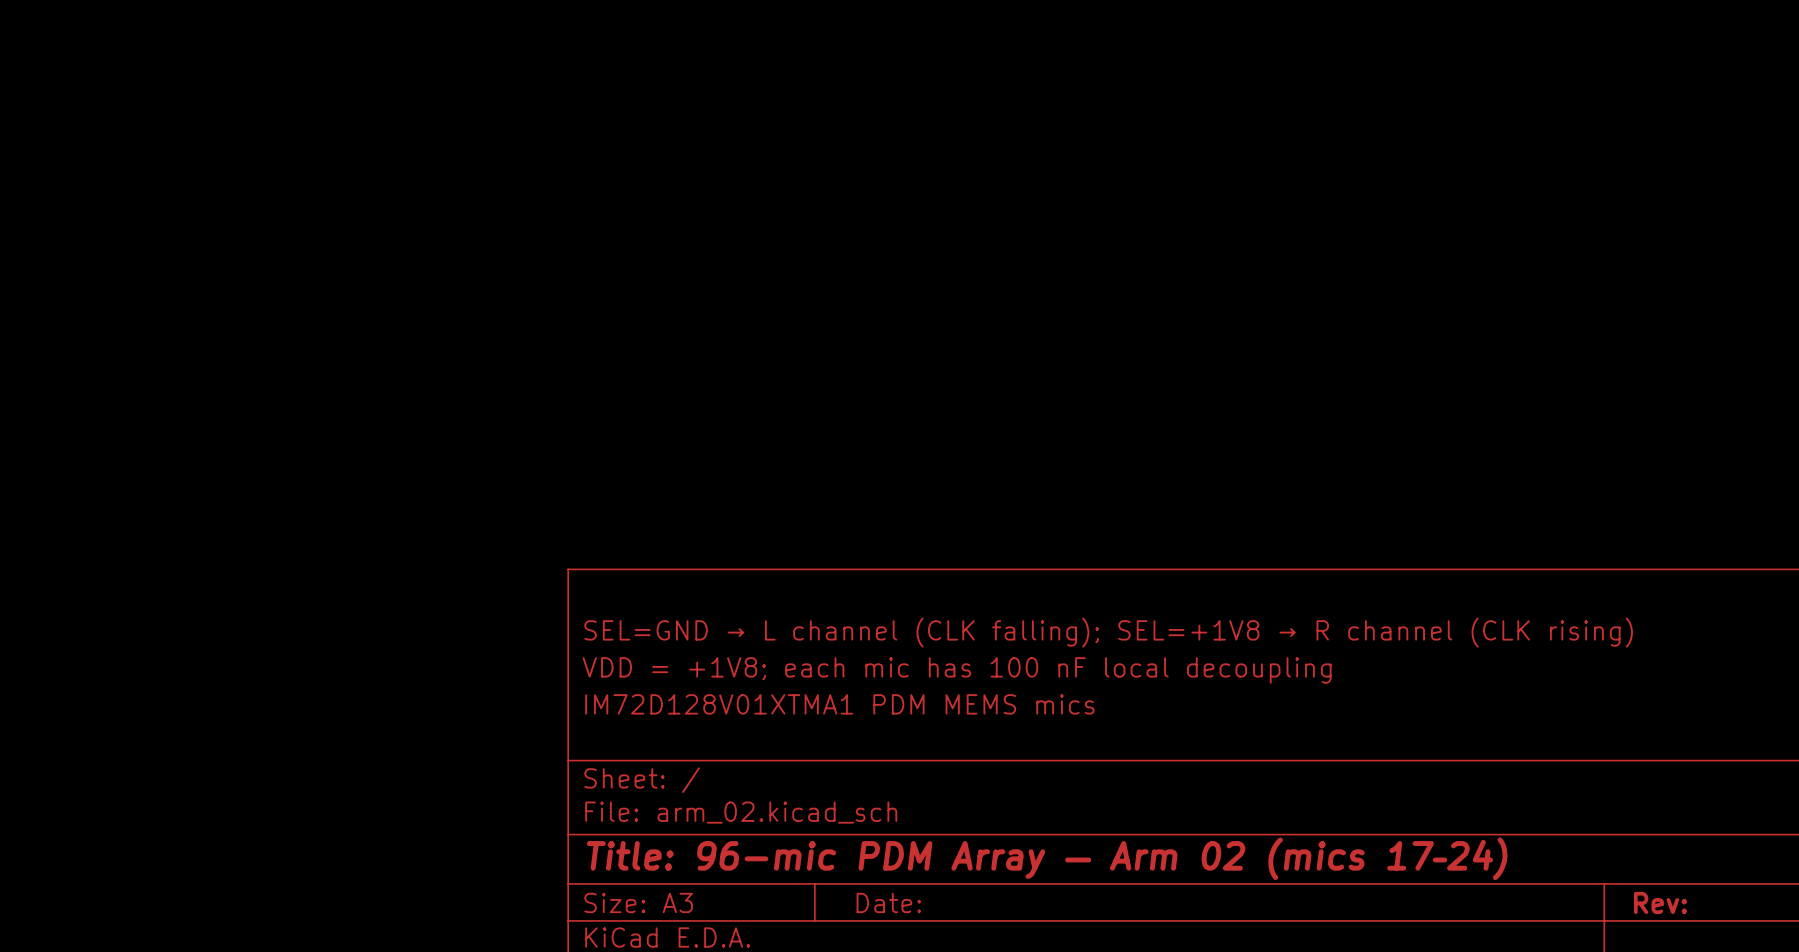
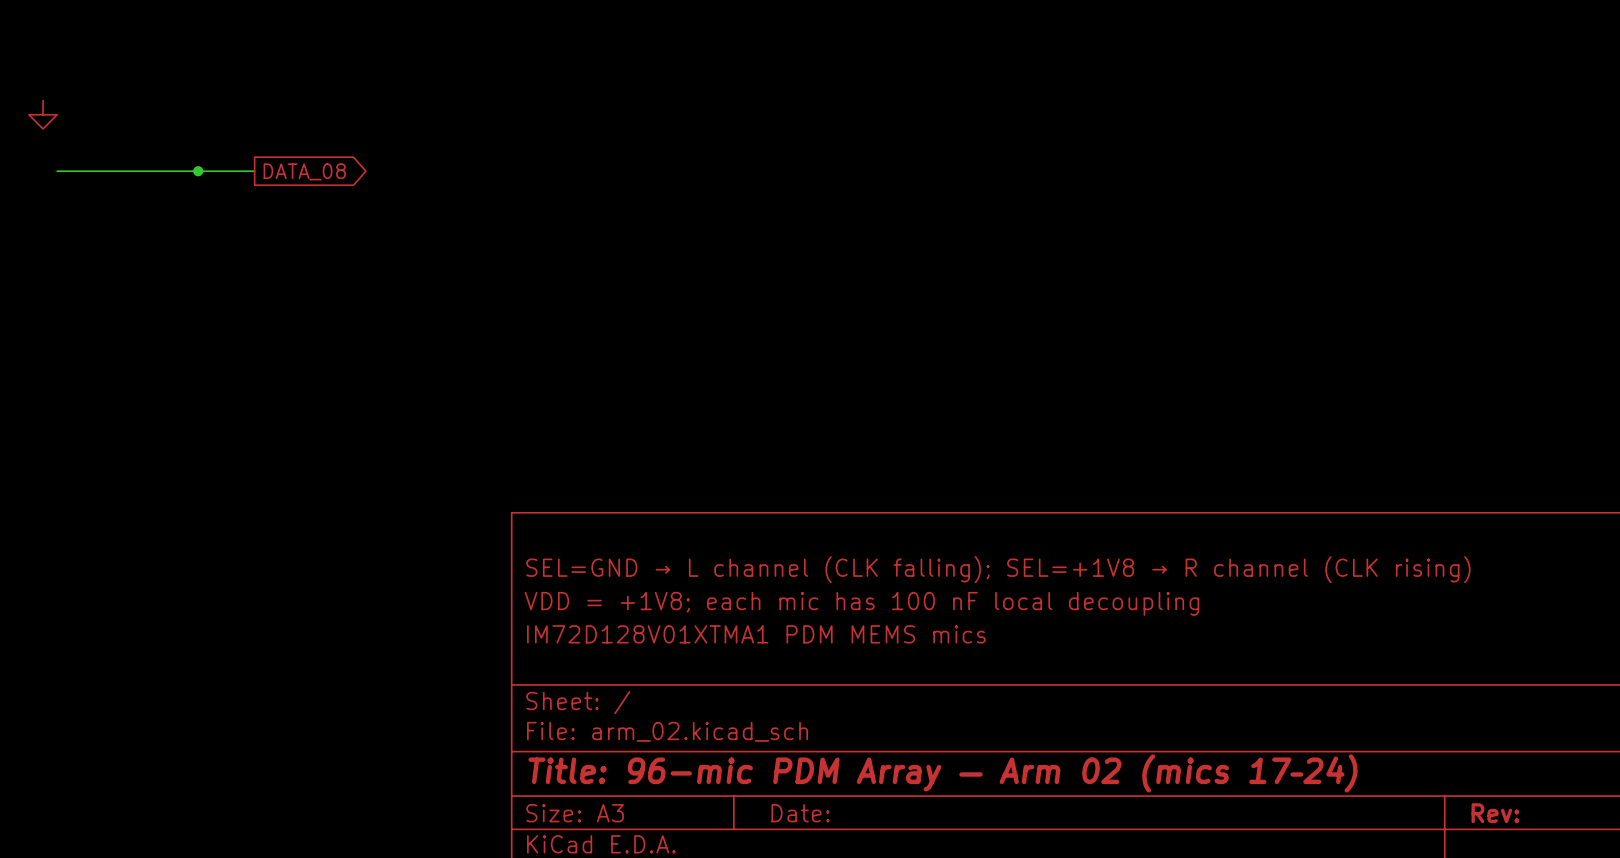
power symbol: none -> (43, 114)
wire: none -> (57, 171) (254, 171)
junction: none -> (198, 171)
global label: none -> DATA_08 (304, 171)

